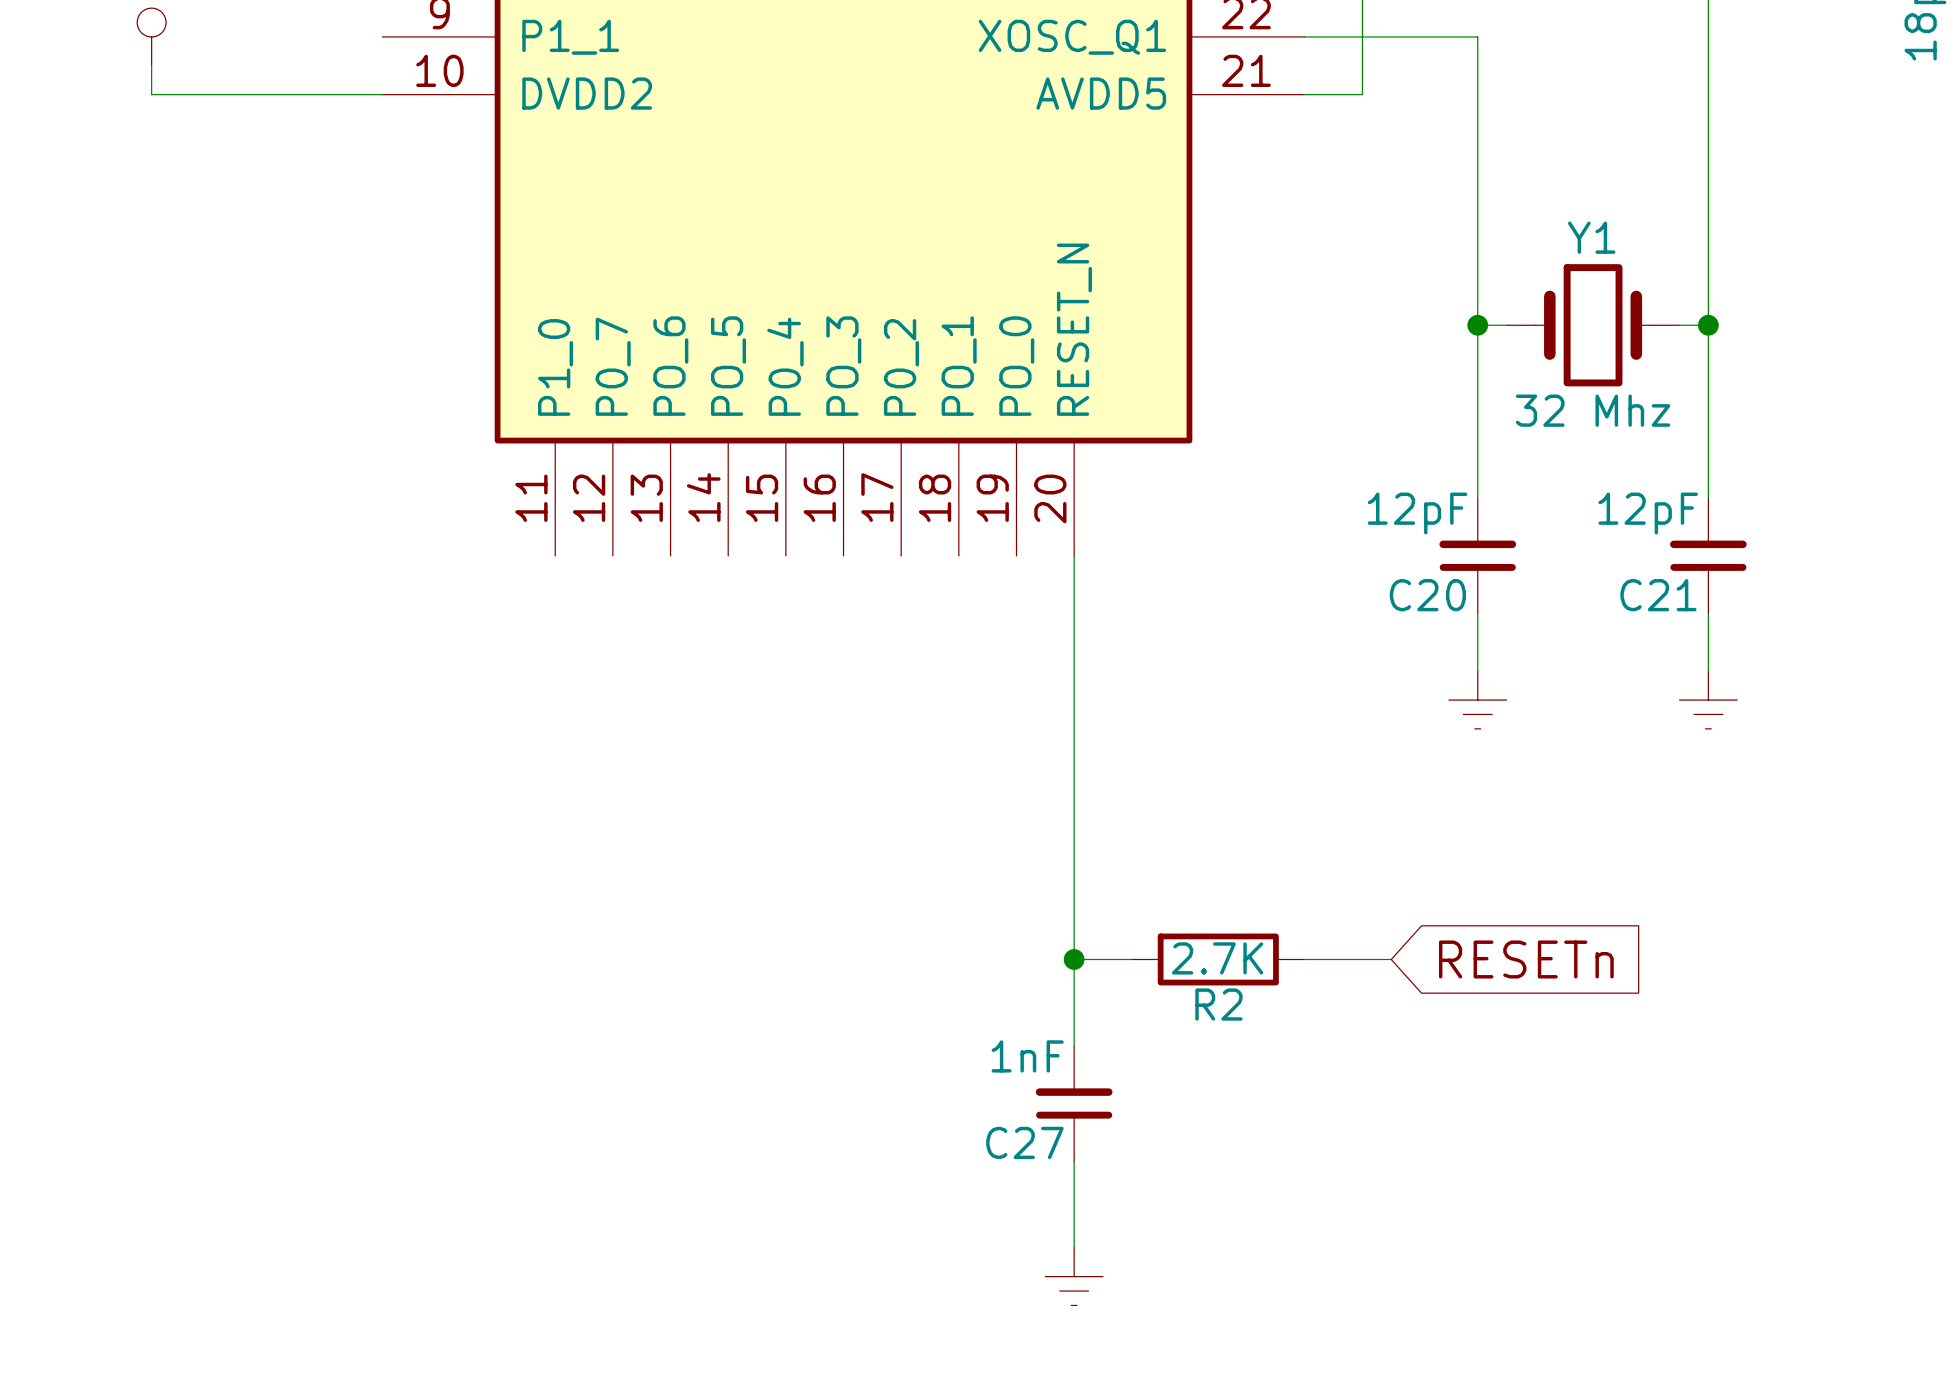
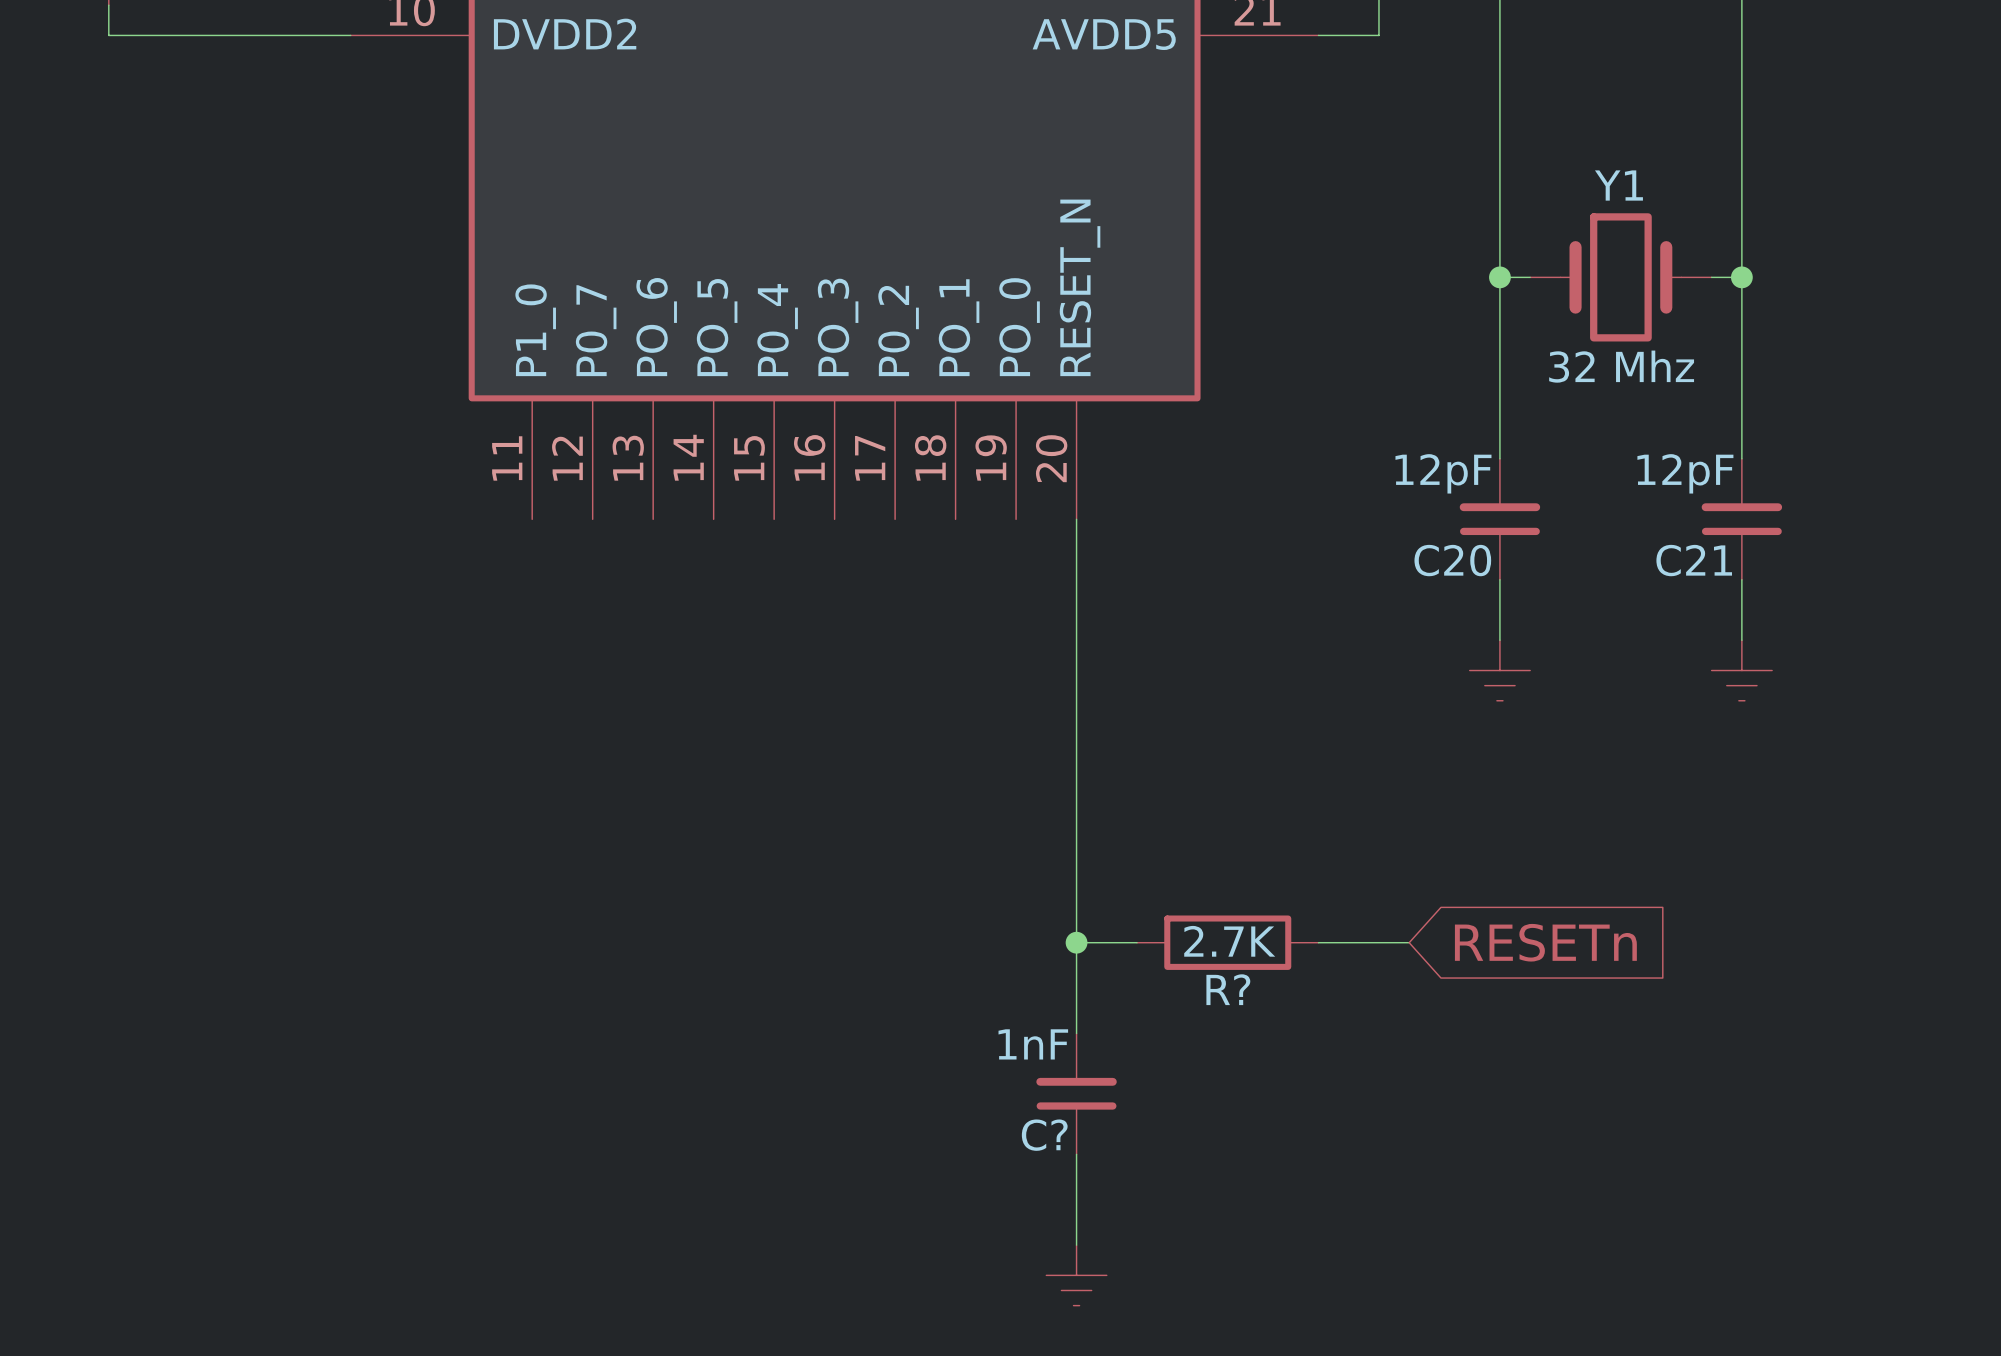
R2 name: R2 (1218, 1004) -> R? (1228, 989)
C27 name: C27 (1024, 1142) -> C? (1044, 1135)

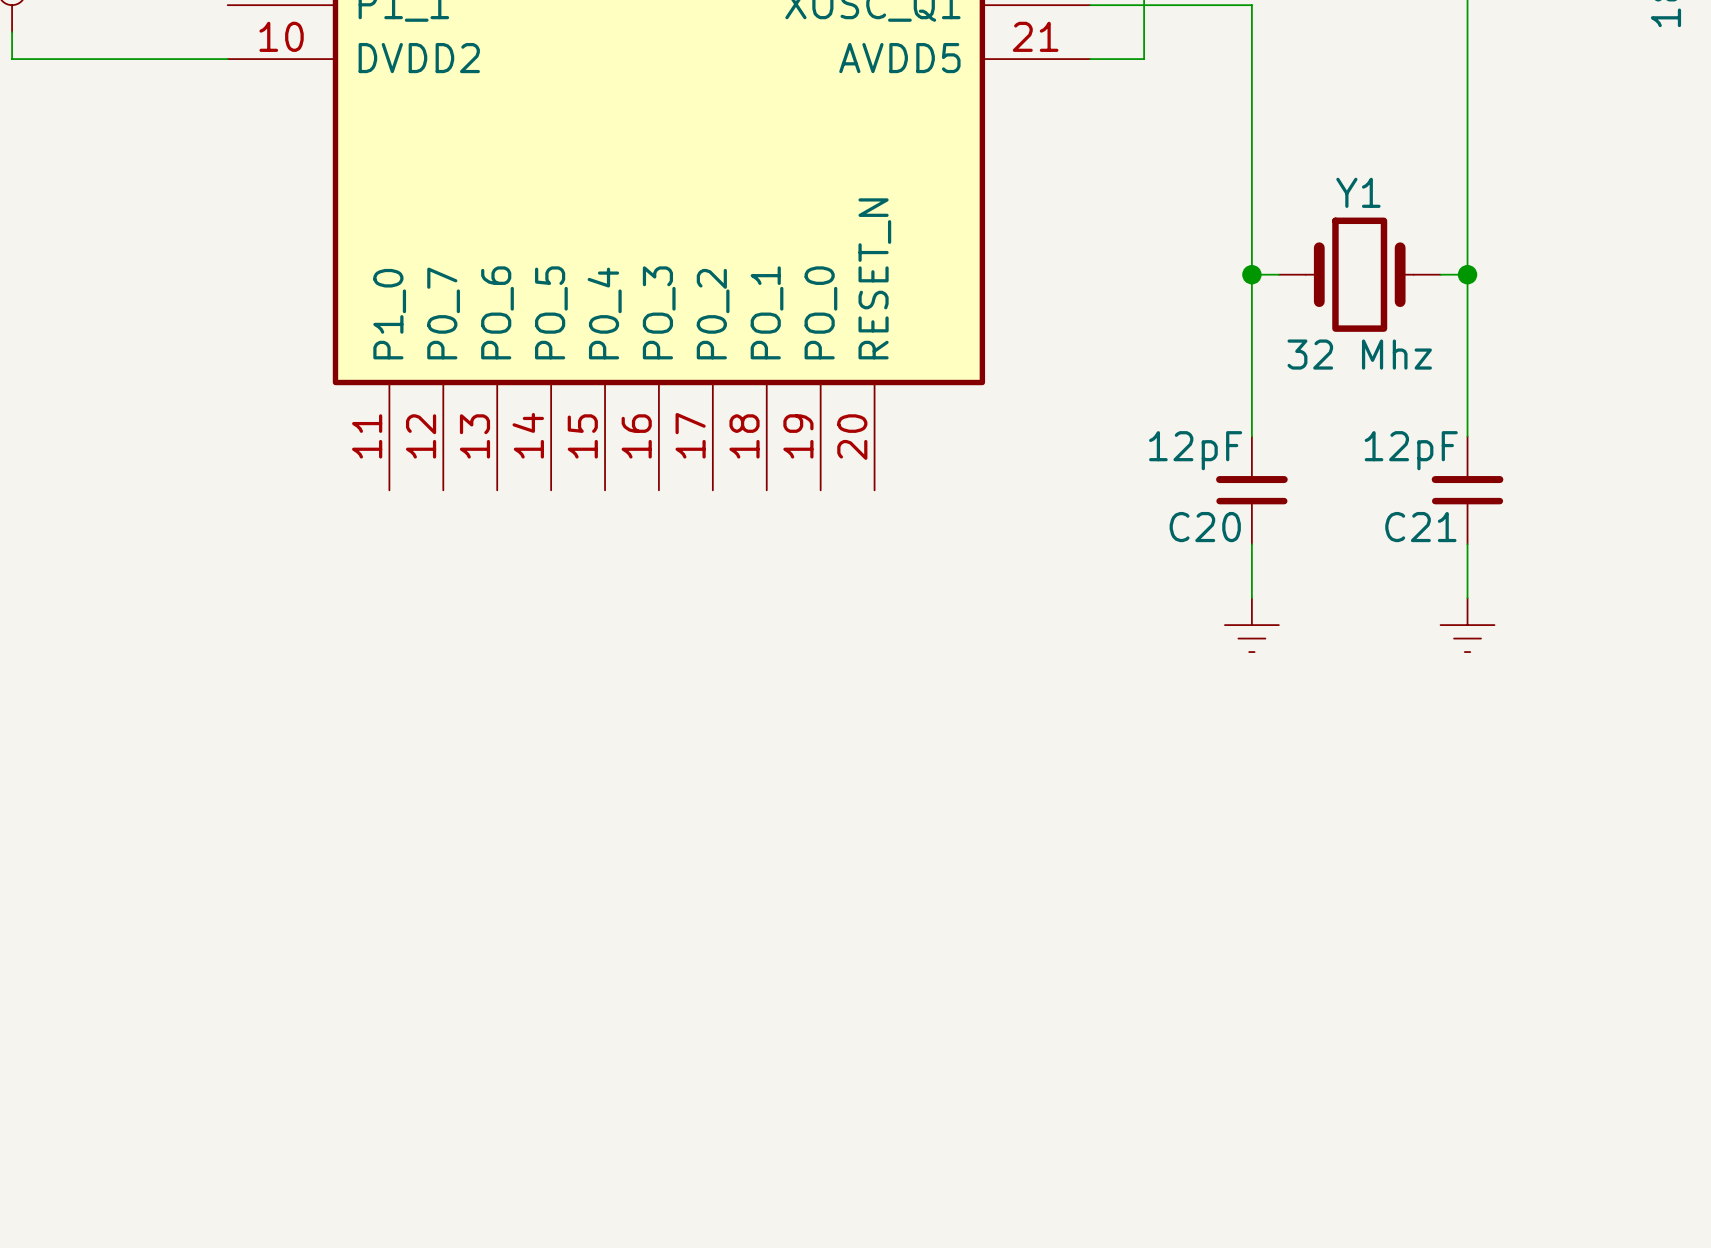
wire: (1076, 519) (1076, 1033) -> none
wire: (1076, 942) (1137, 942) -> none
junction: (1076, 942) -> none
R?: 2.7K (1227, 942) -> none
wire: (1318, 942) (1409, 942) -> none
global label: RESETn (1545, 942) -> none
C?: 1nF (1076, 1093) -> none
wire: (1076, 1154) (1076, 1245) -> none
power symbol: (1076, 1275) -> none

